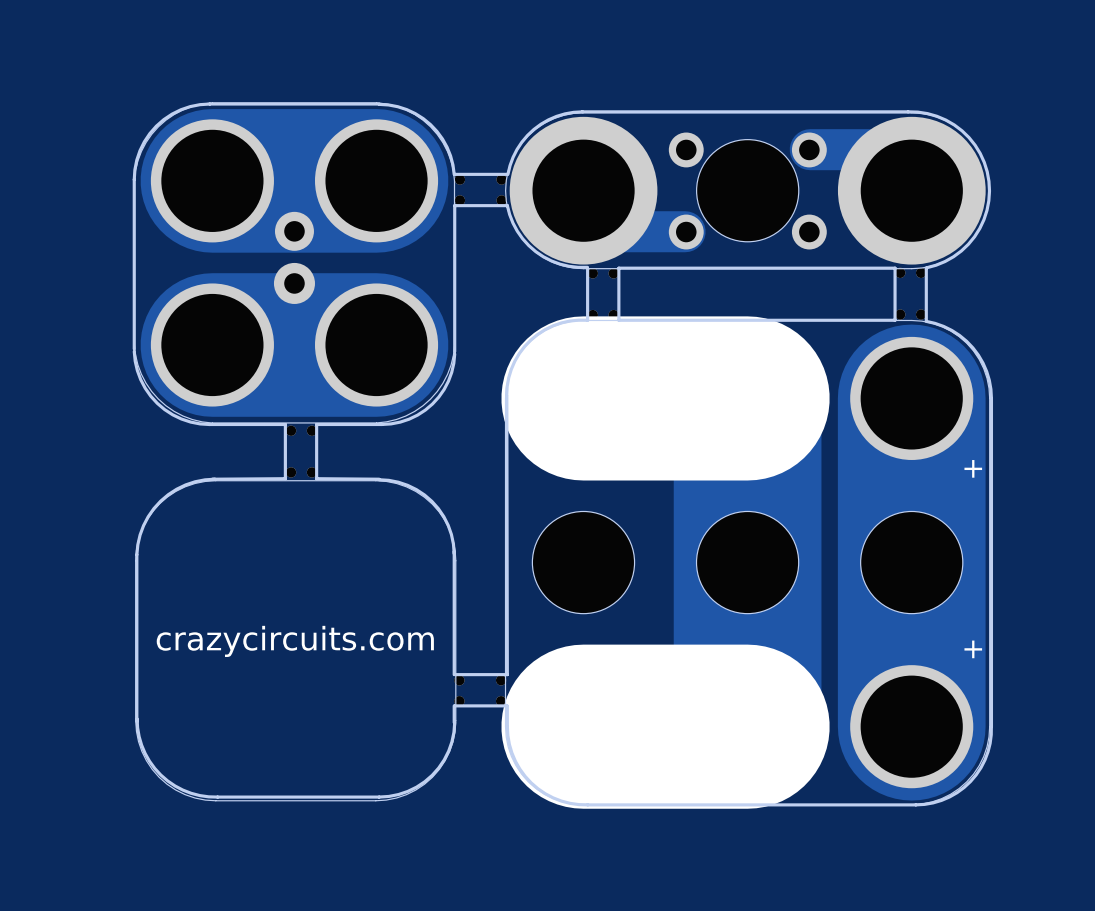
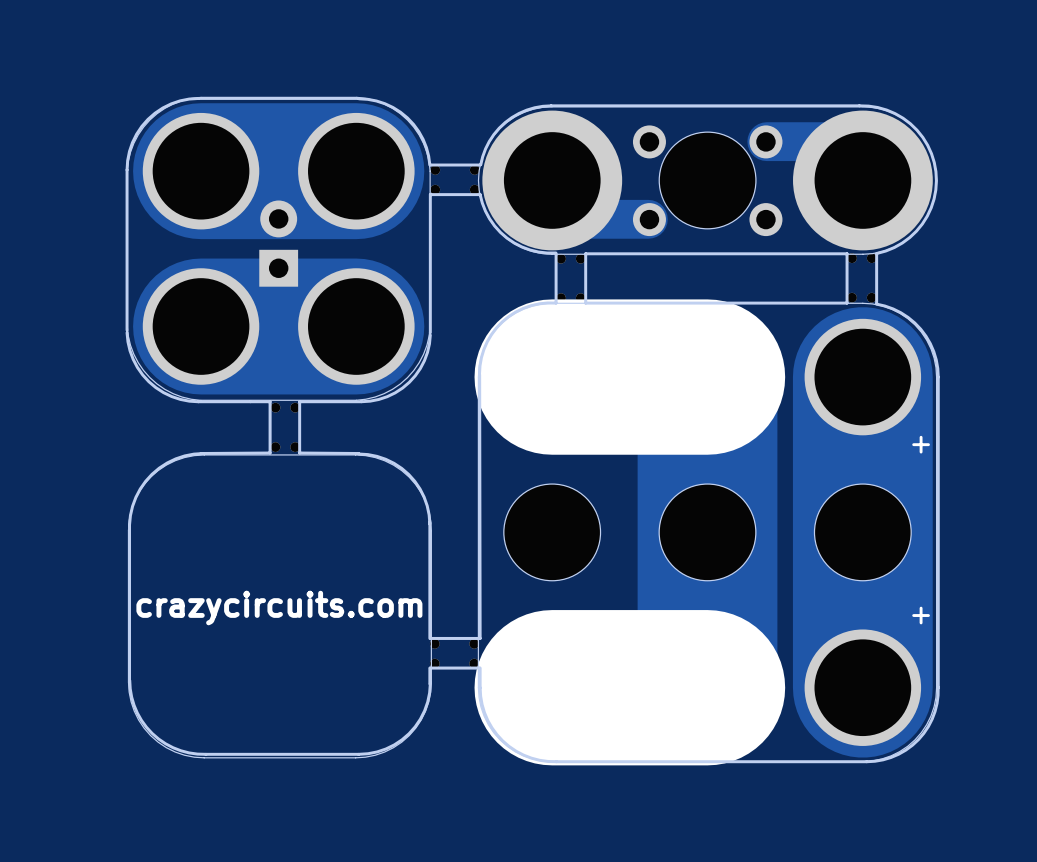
part footprint: [133, 102, 456, 424] -> [126, 96, 431, 401]

